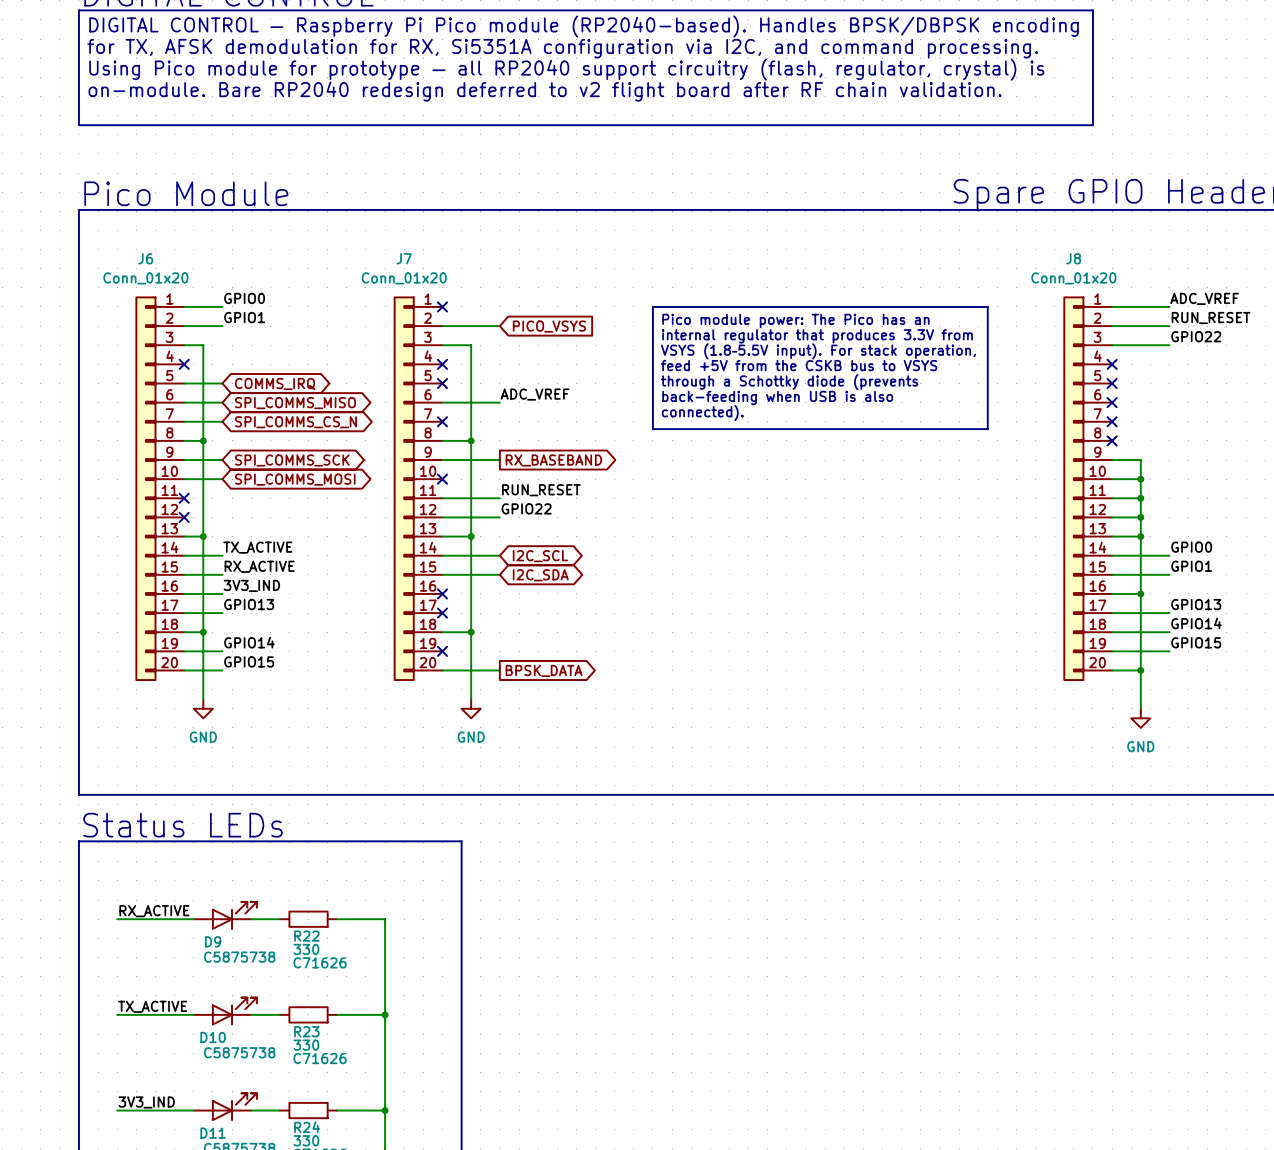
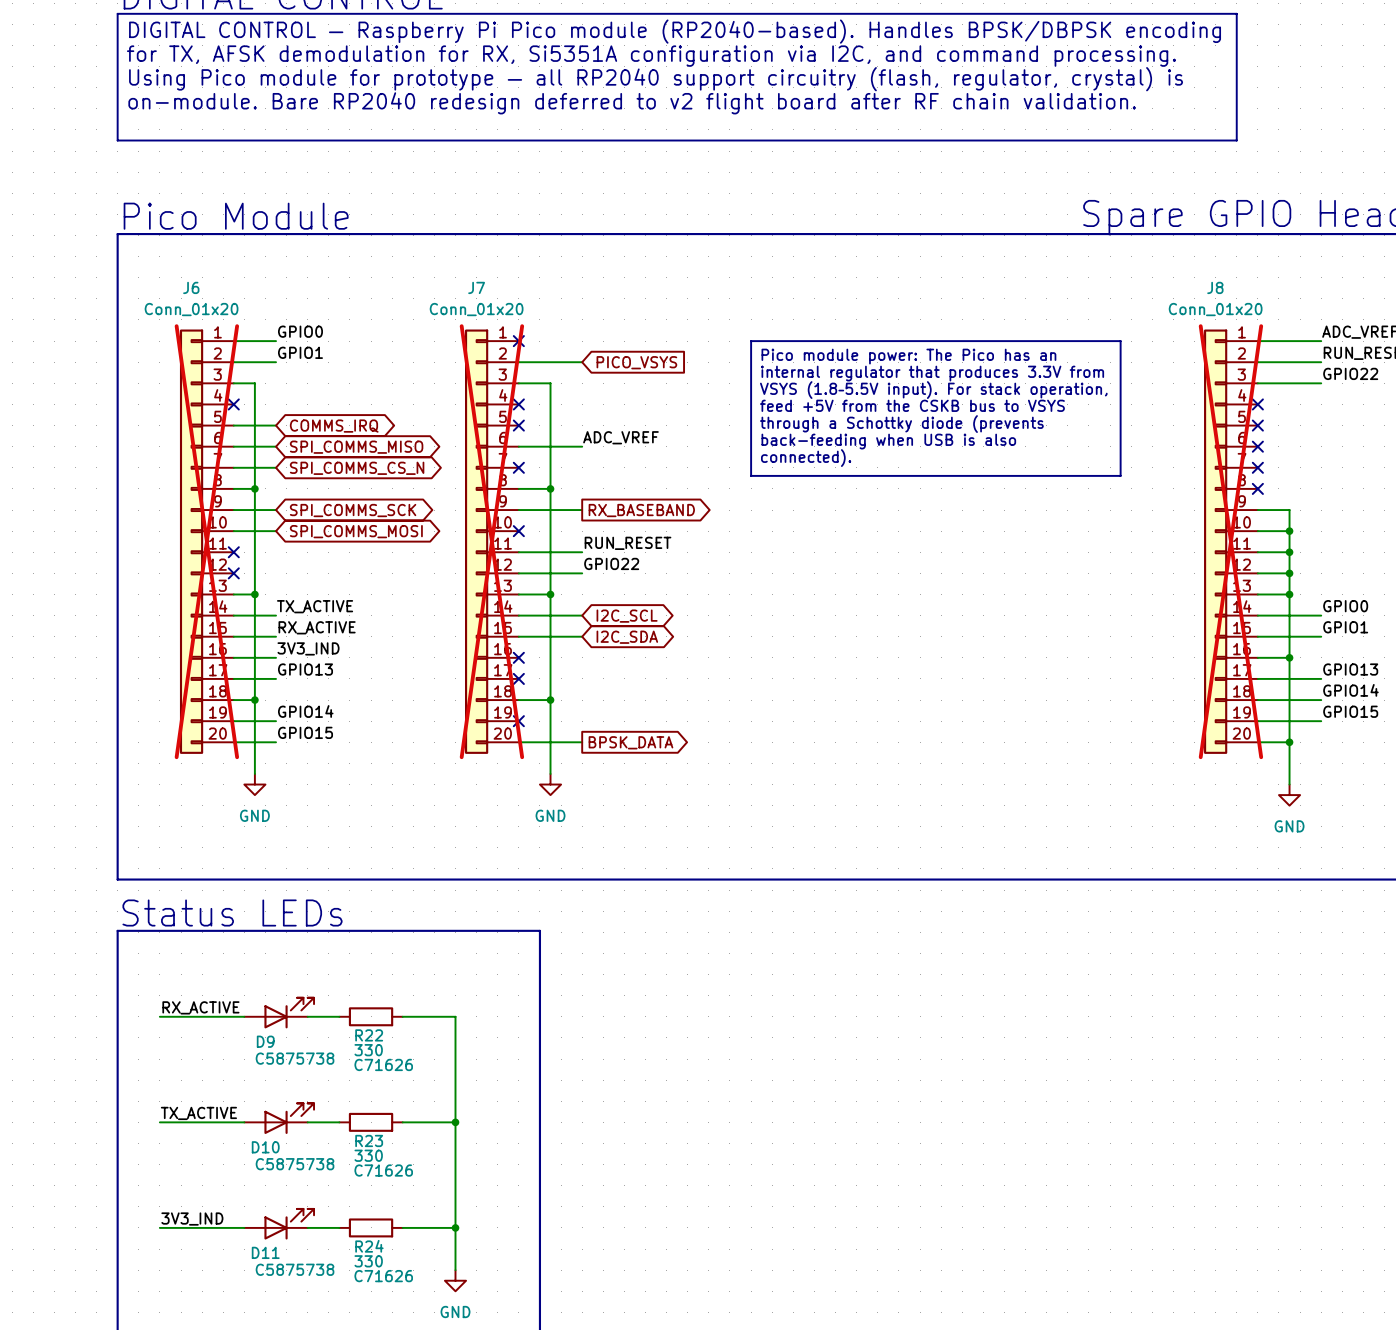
J6 do-not-place cross: none -> (206, 541)
J7 do-not-place cross: none -> (491, 541)
J8 do-not-place cross: none -> (1230, 541)

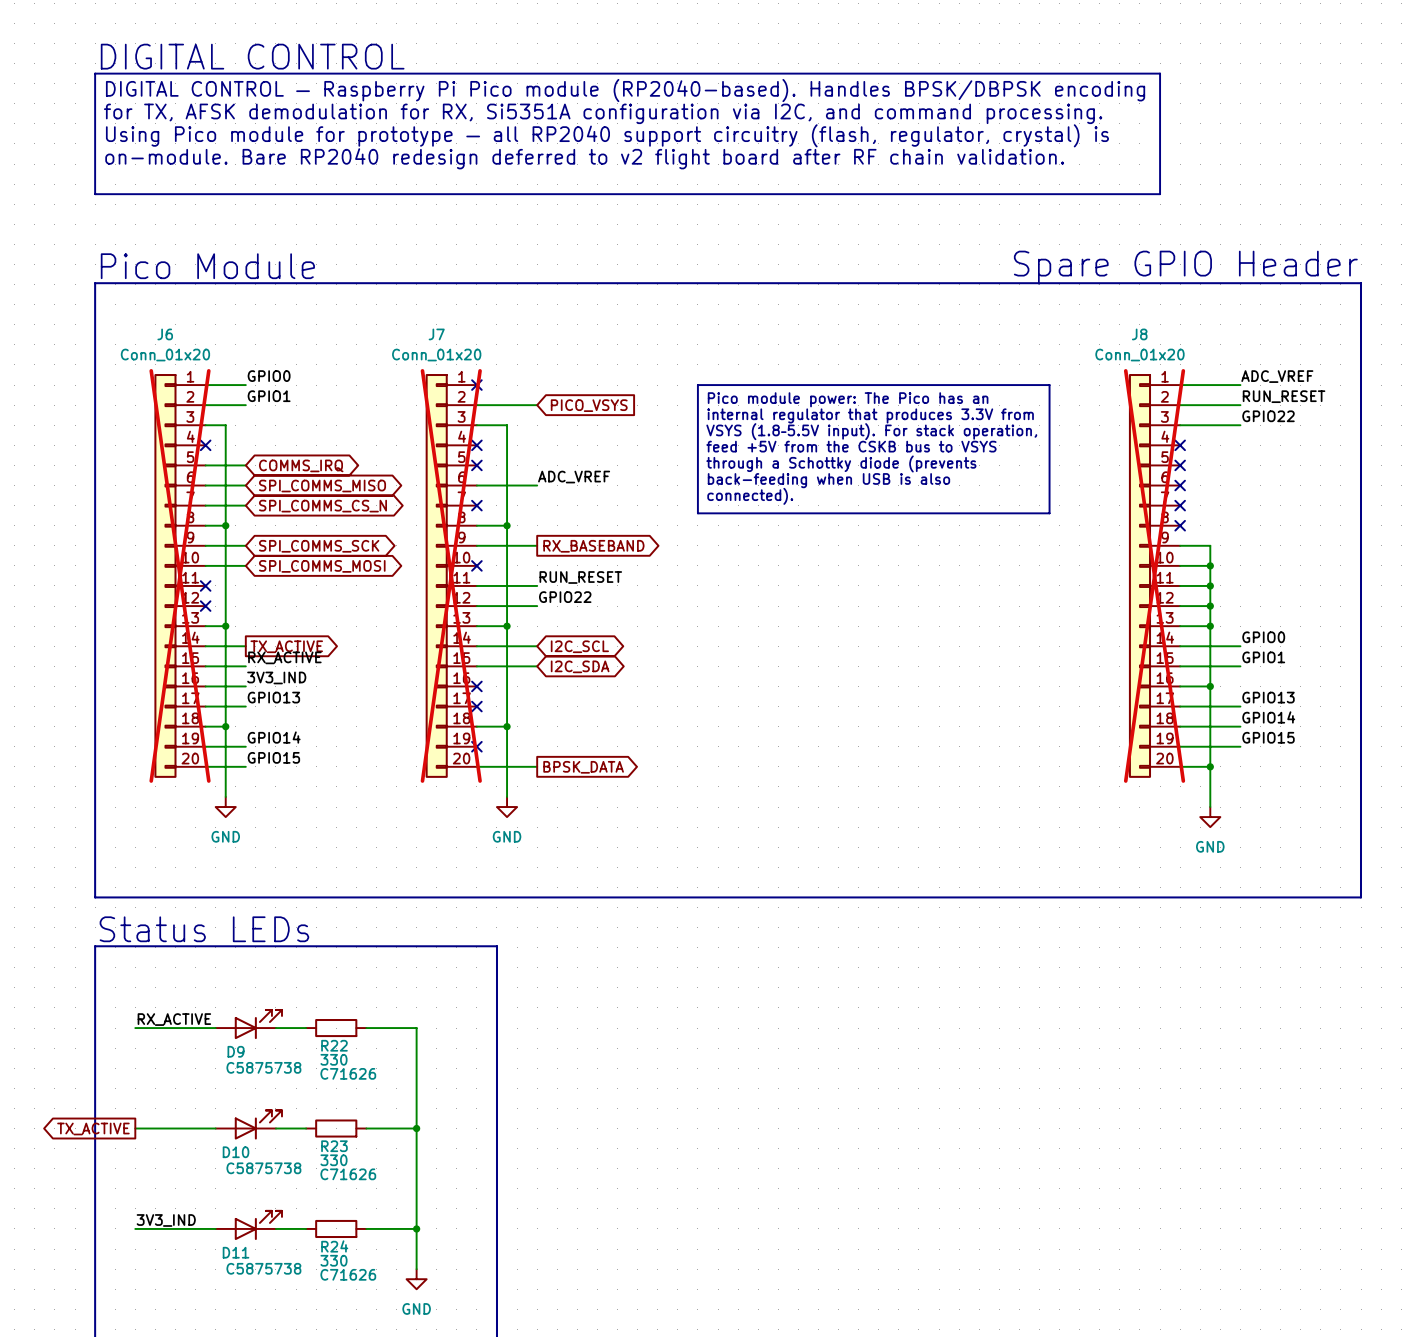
label: TX_ACTIVE (315, 606) -> none
global label: none -> TX_ACTIVE (286, 646)
label: TX_ACTIVE (198, 1113) -> none
global label: none -> TX_ACTIVE (93, 1128)

